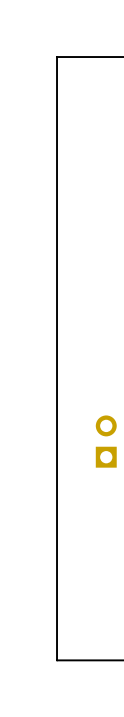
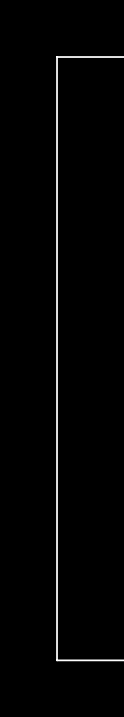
part: (106, 441) -> none

